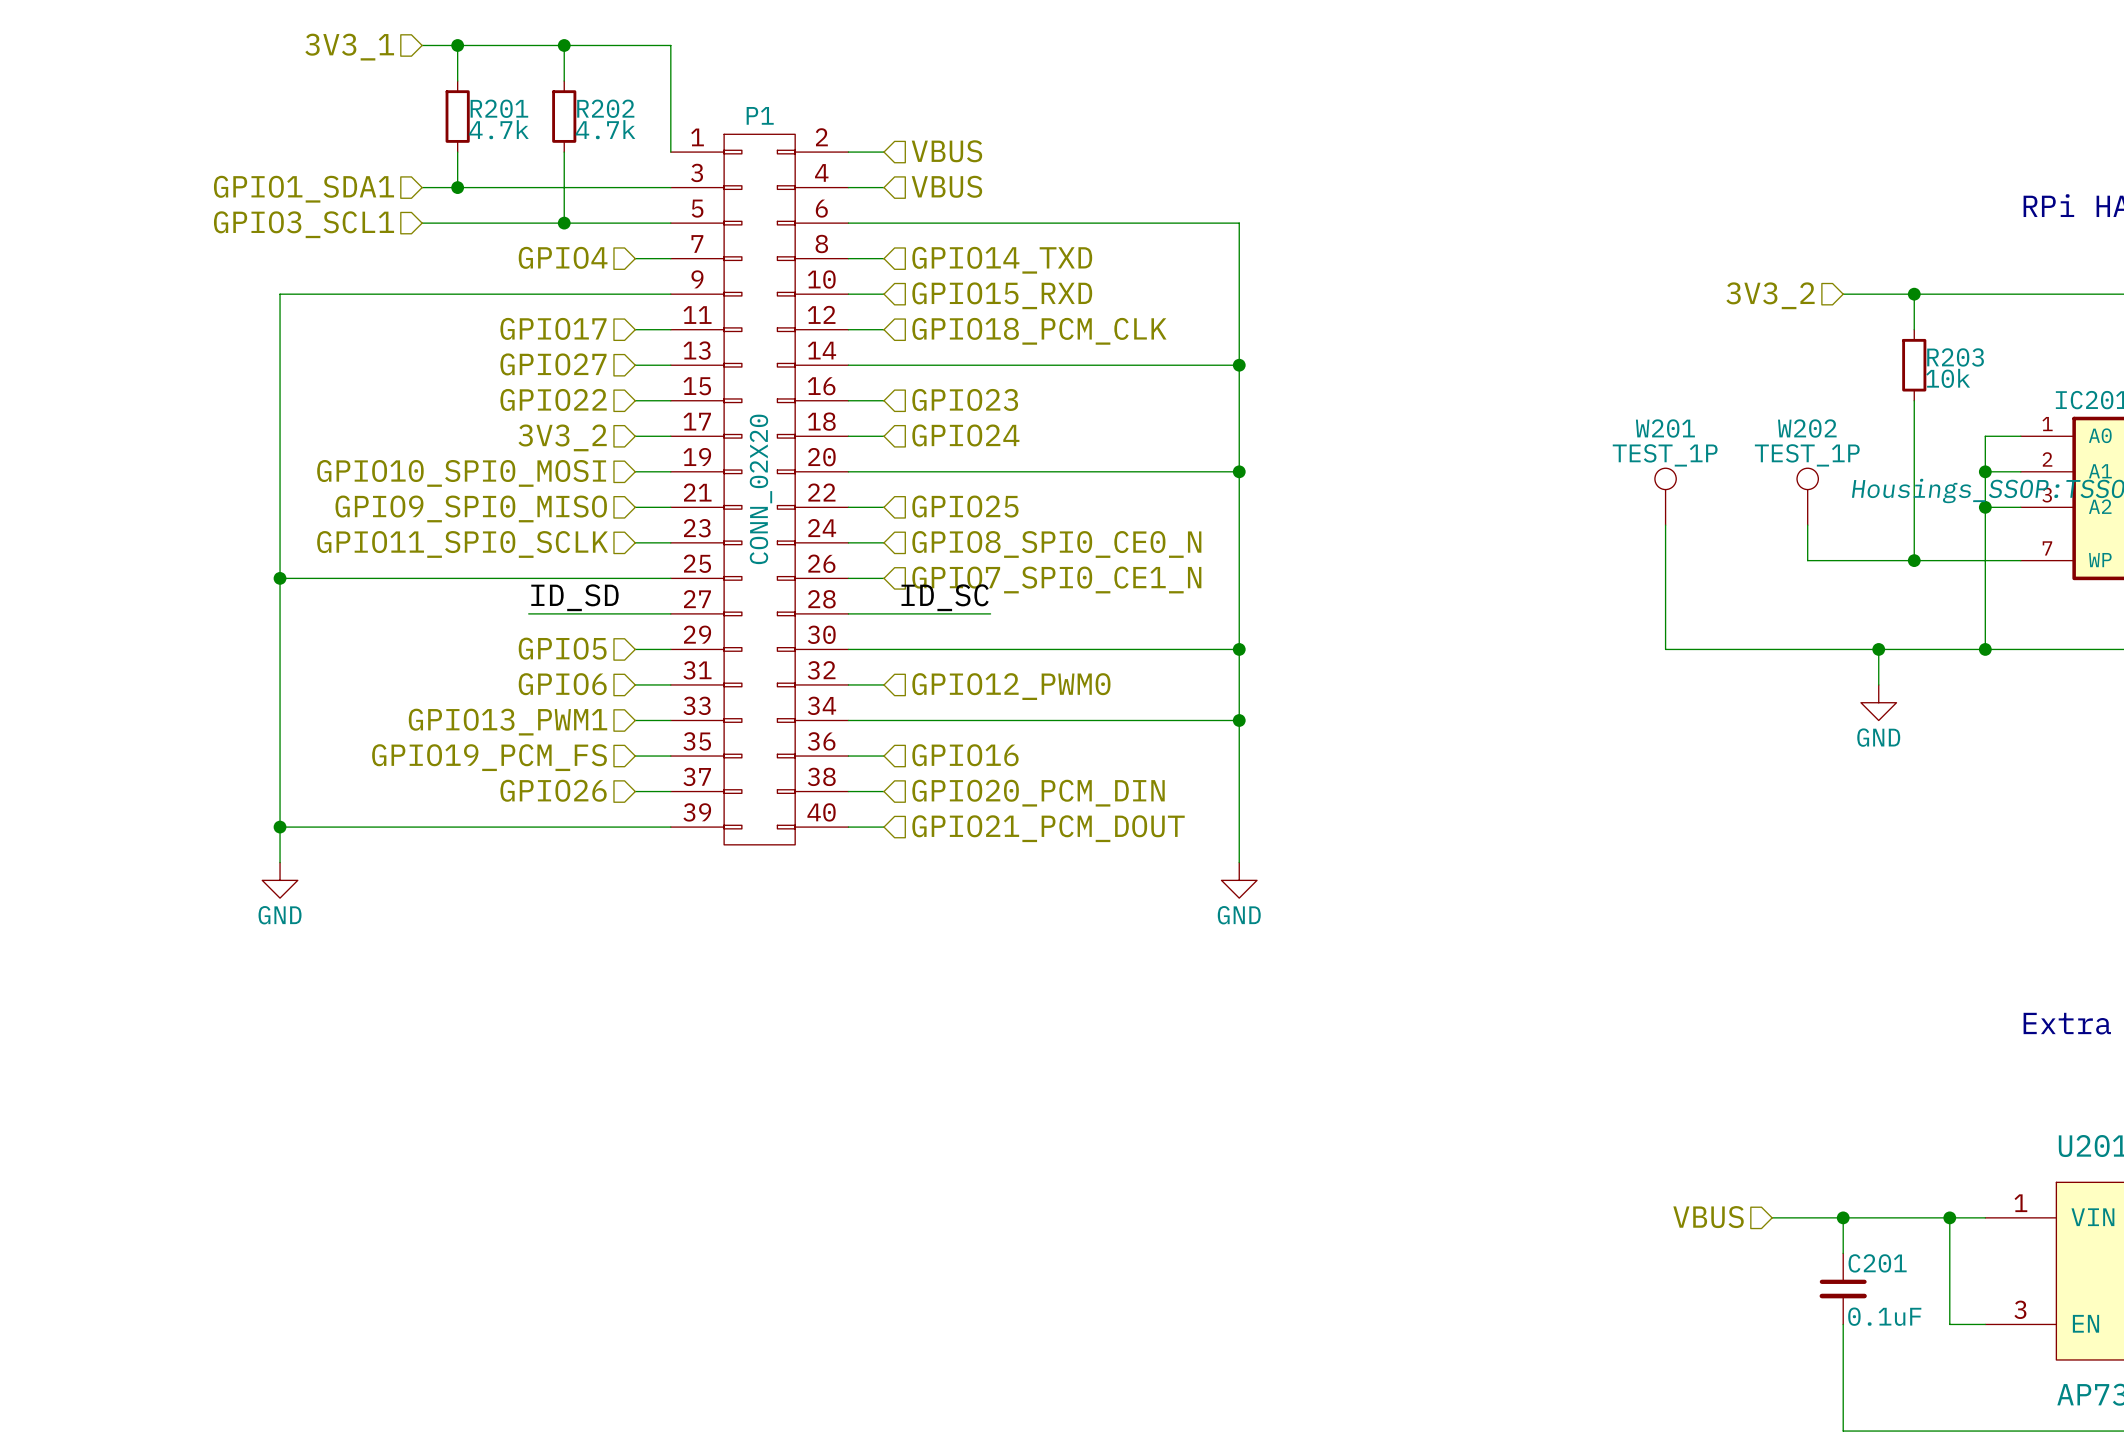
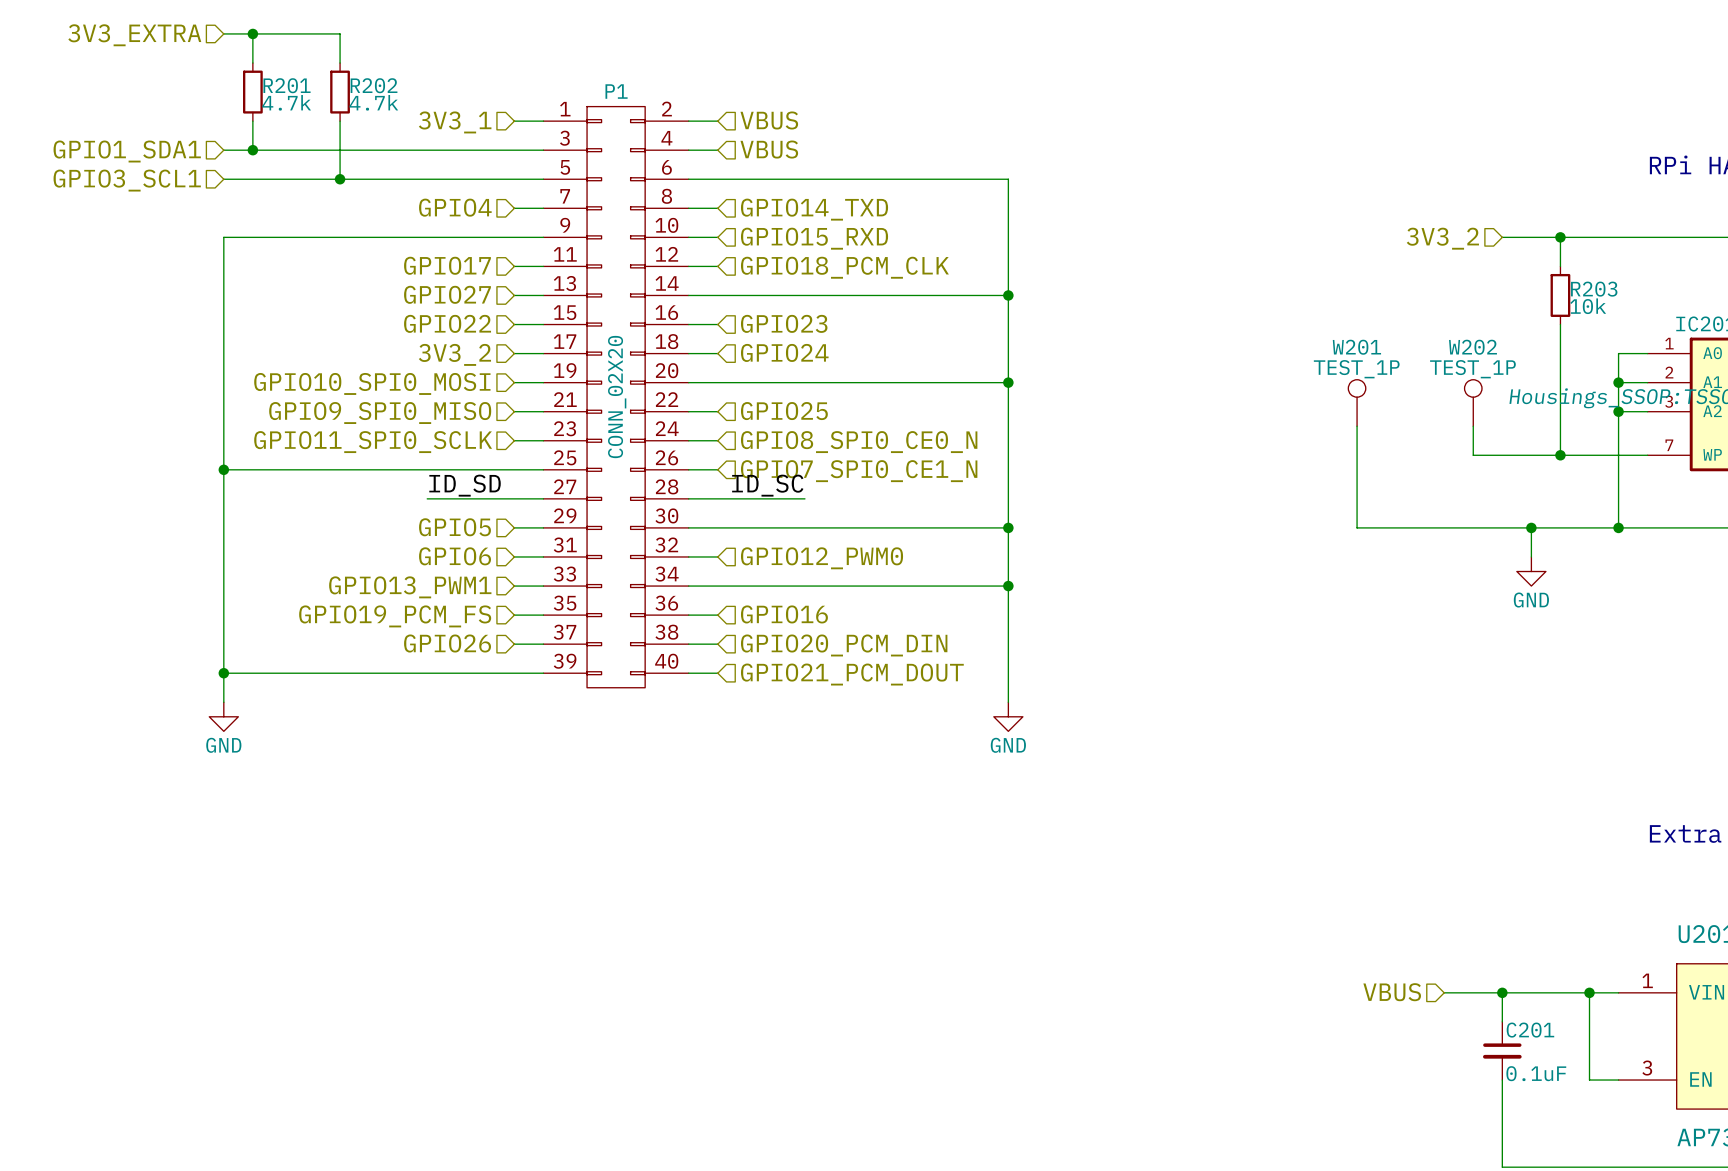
wire: none -> (223, 33) (340, 33) (340, 63)
junction: none -> (252, 33)
wire: (422, 45) (670, 45) (670, 152) -> (514, 121) (543, 121)
wire: (457, 45) (457, 81) -> (252, 33) (252, 63)
junction: (457, 45) -> none
wire: (564, 45) (564, 81) -> none
junction: (564, 45) -> none
hierarchical label: none -> 3V3_EXTRA (134, 35)
hierarchical label position: 3V3_1 (349, 47) -> 3V3_1 (455, 122)
R201 position: (457, 116) -> (252, 92)
R202 position: (564, 116) -> (340, 92)
wire: none -> (340, 121) (340, 179) (223, 179)
wire: (457, 152) (457, 187) -> (252, 121) (252, 150)
wire: (564, 152) (564, 223) -> none
wire: none -> (223, 150) (340, 150)
junction: none -> (252, 150)
junction position: (457, 187) -> (340, 179)
hierarchical label position: GPIO1_SDA1 (304, 189) -> GPIO1_SDA1 (127, 151)
junction: (564, 223) -> none
hierarchical label position: GPIO3_SCL1 (304, 224) -> GPIO3_SCL1 (127, 180)

